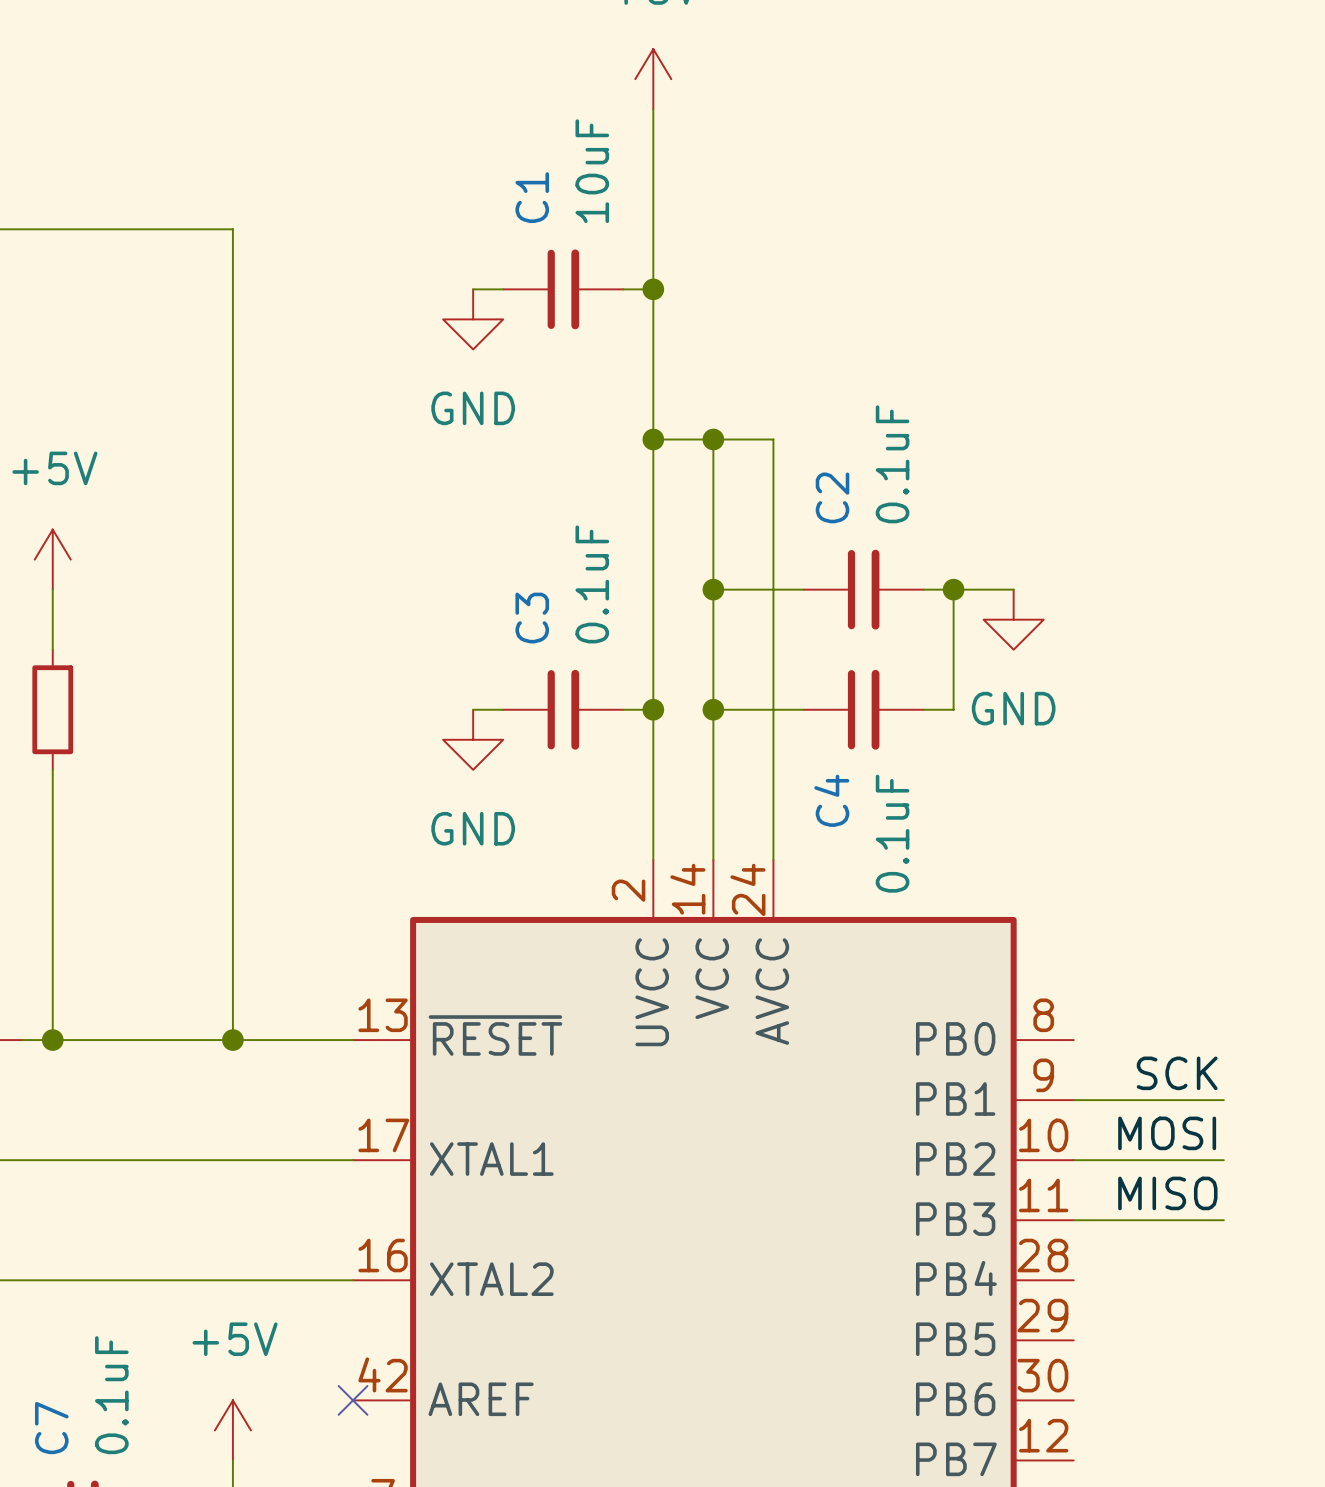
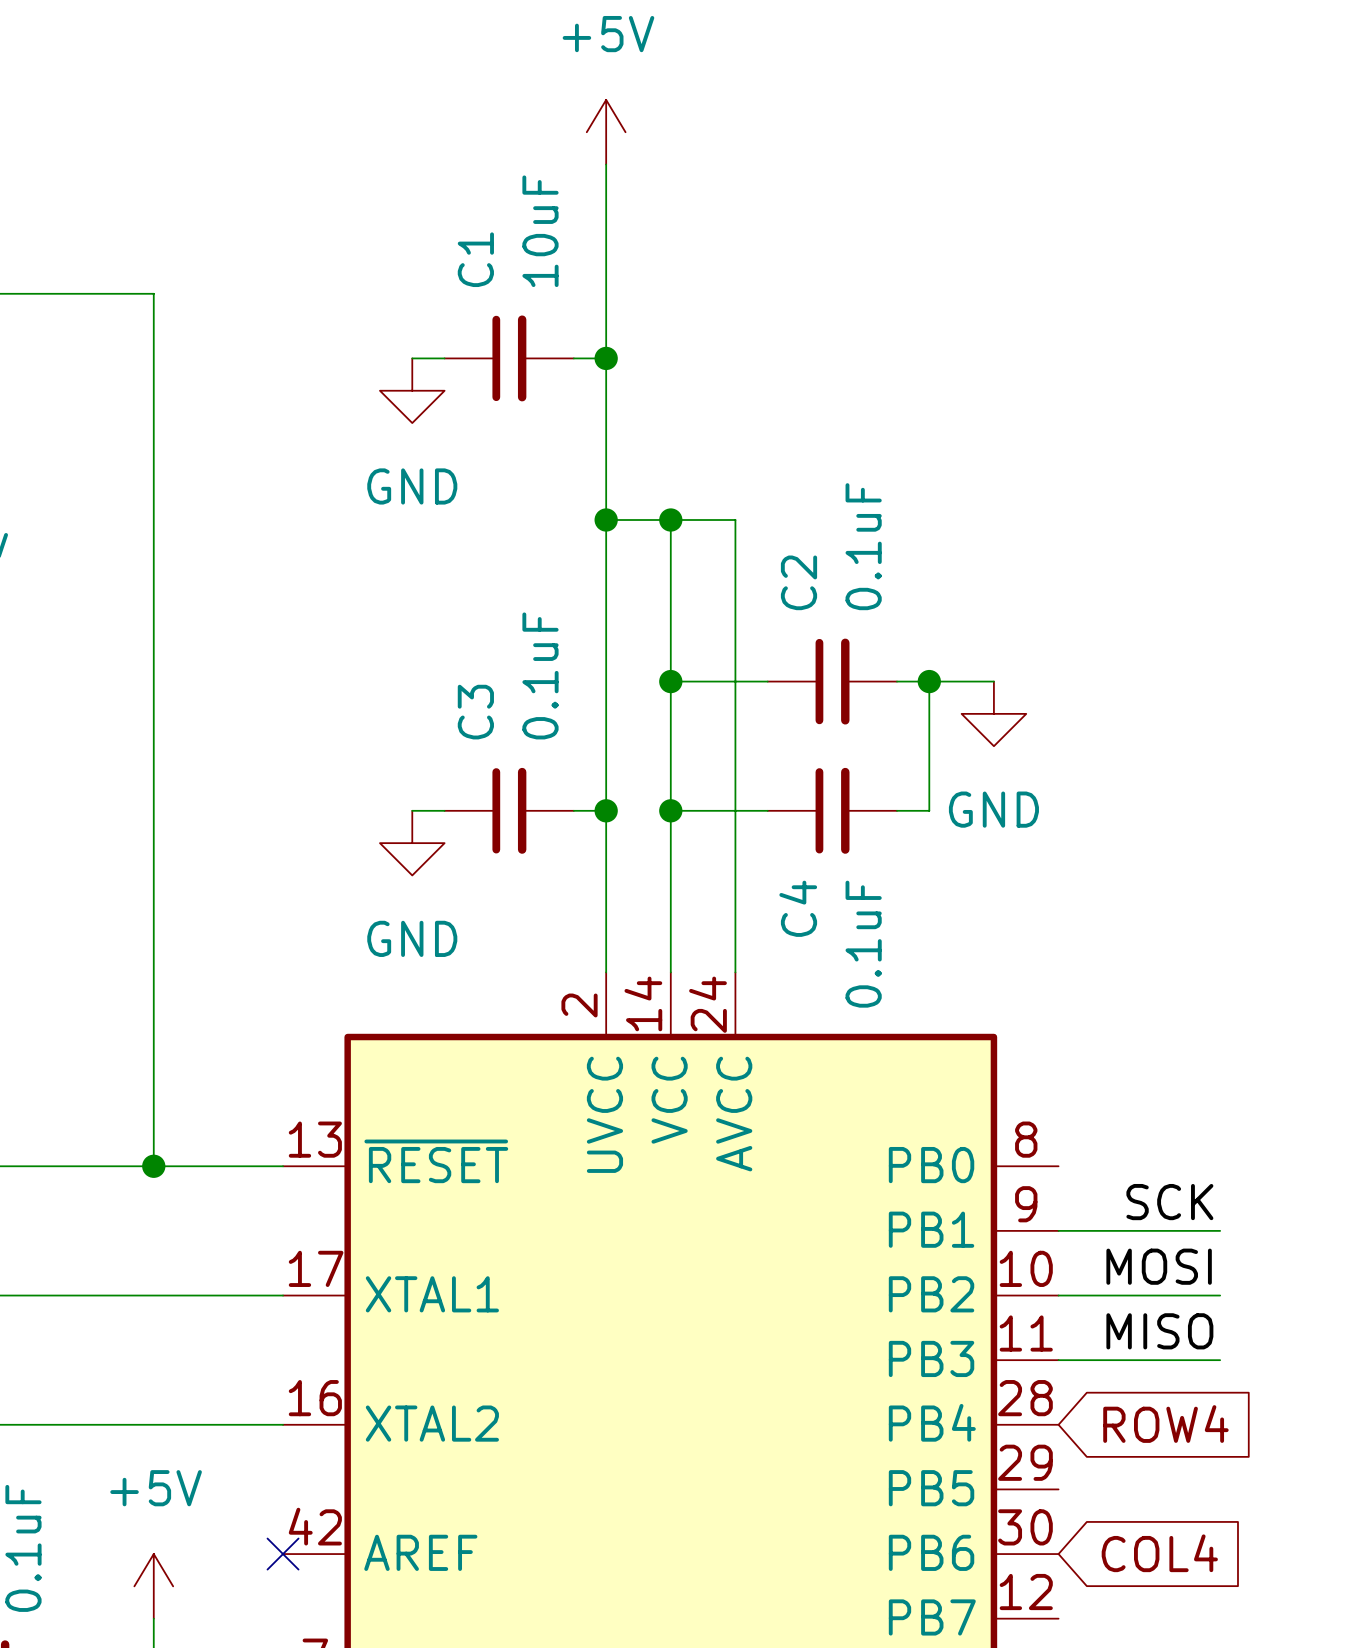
global label: none -> ROW4 (1165, 1424)
global label: none -> COL4 (1159, 1553)

